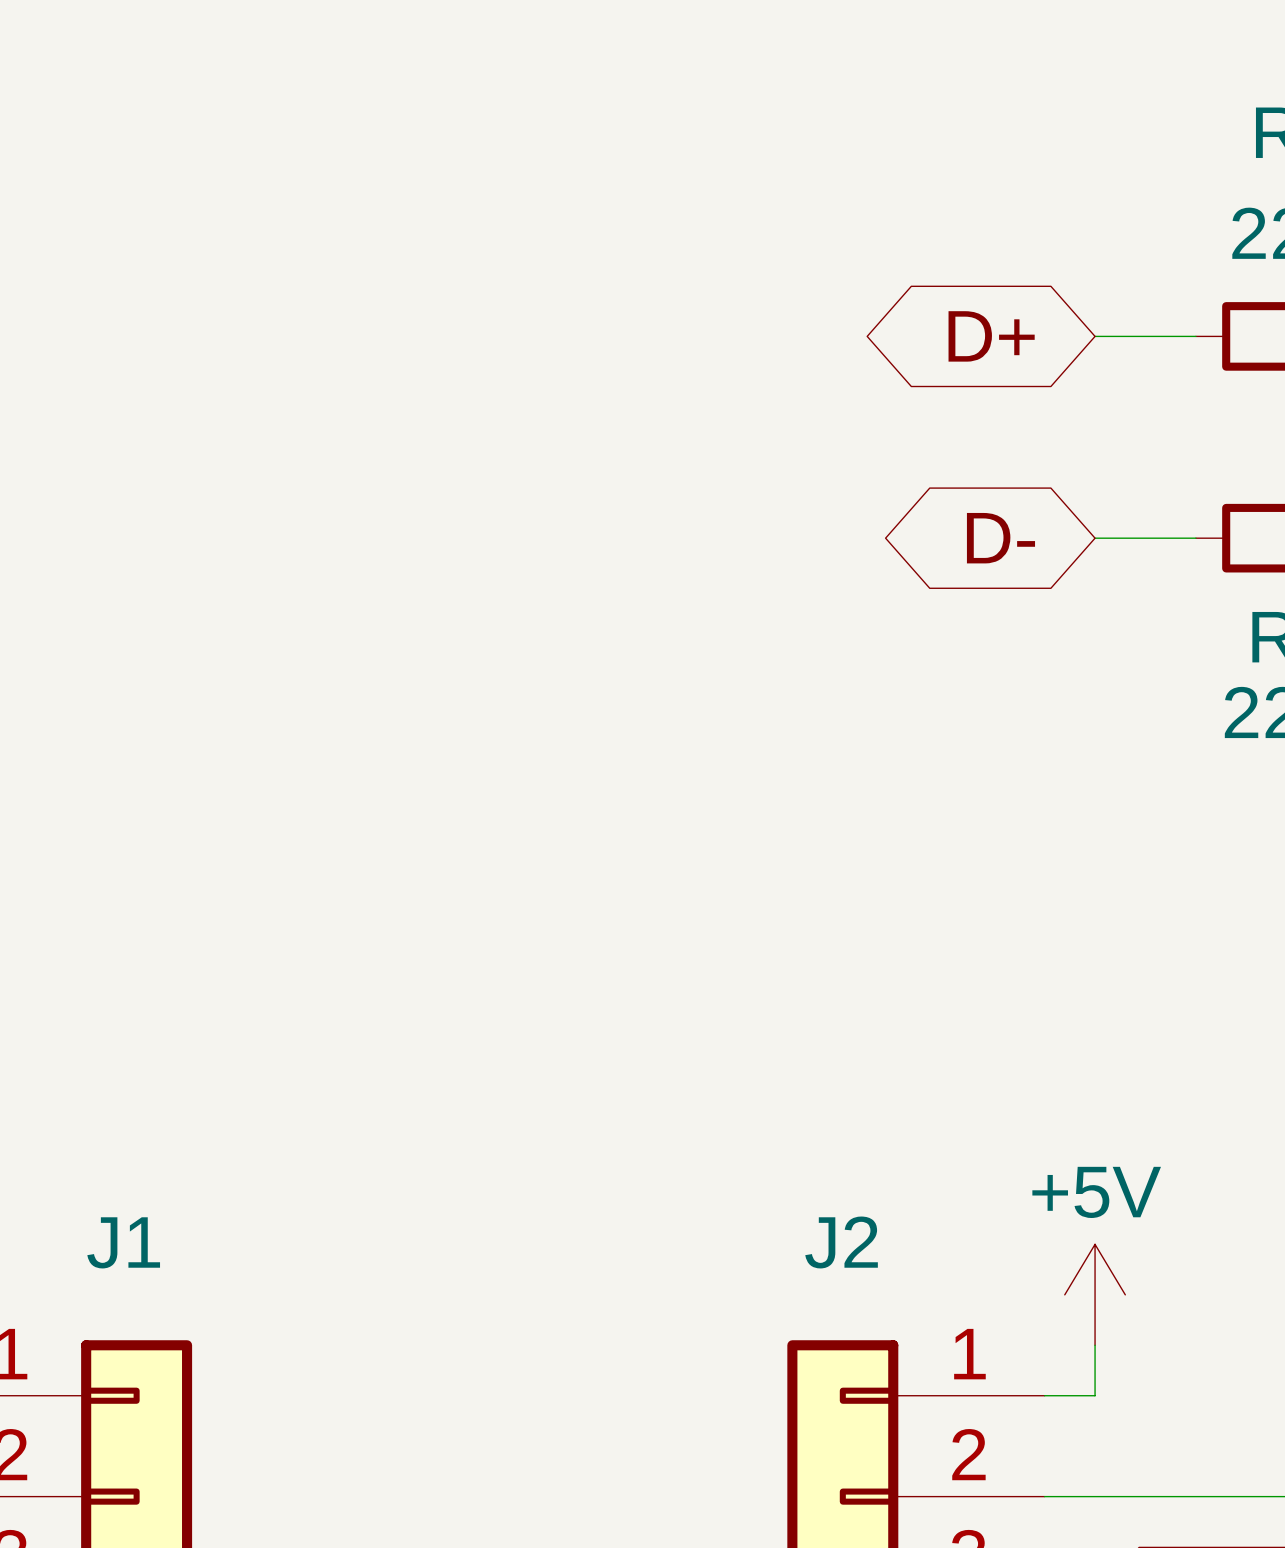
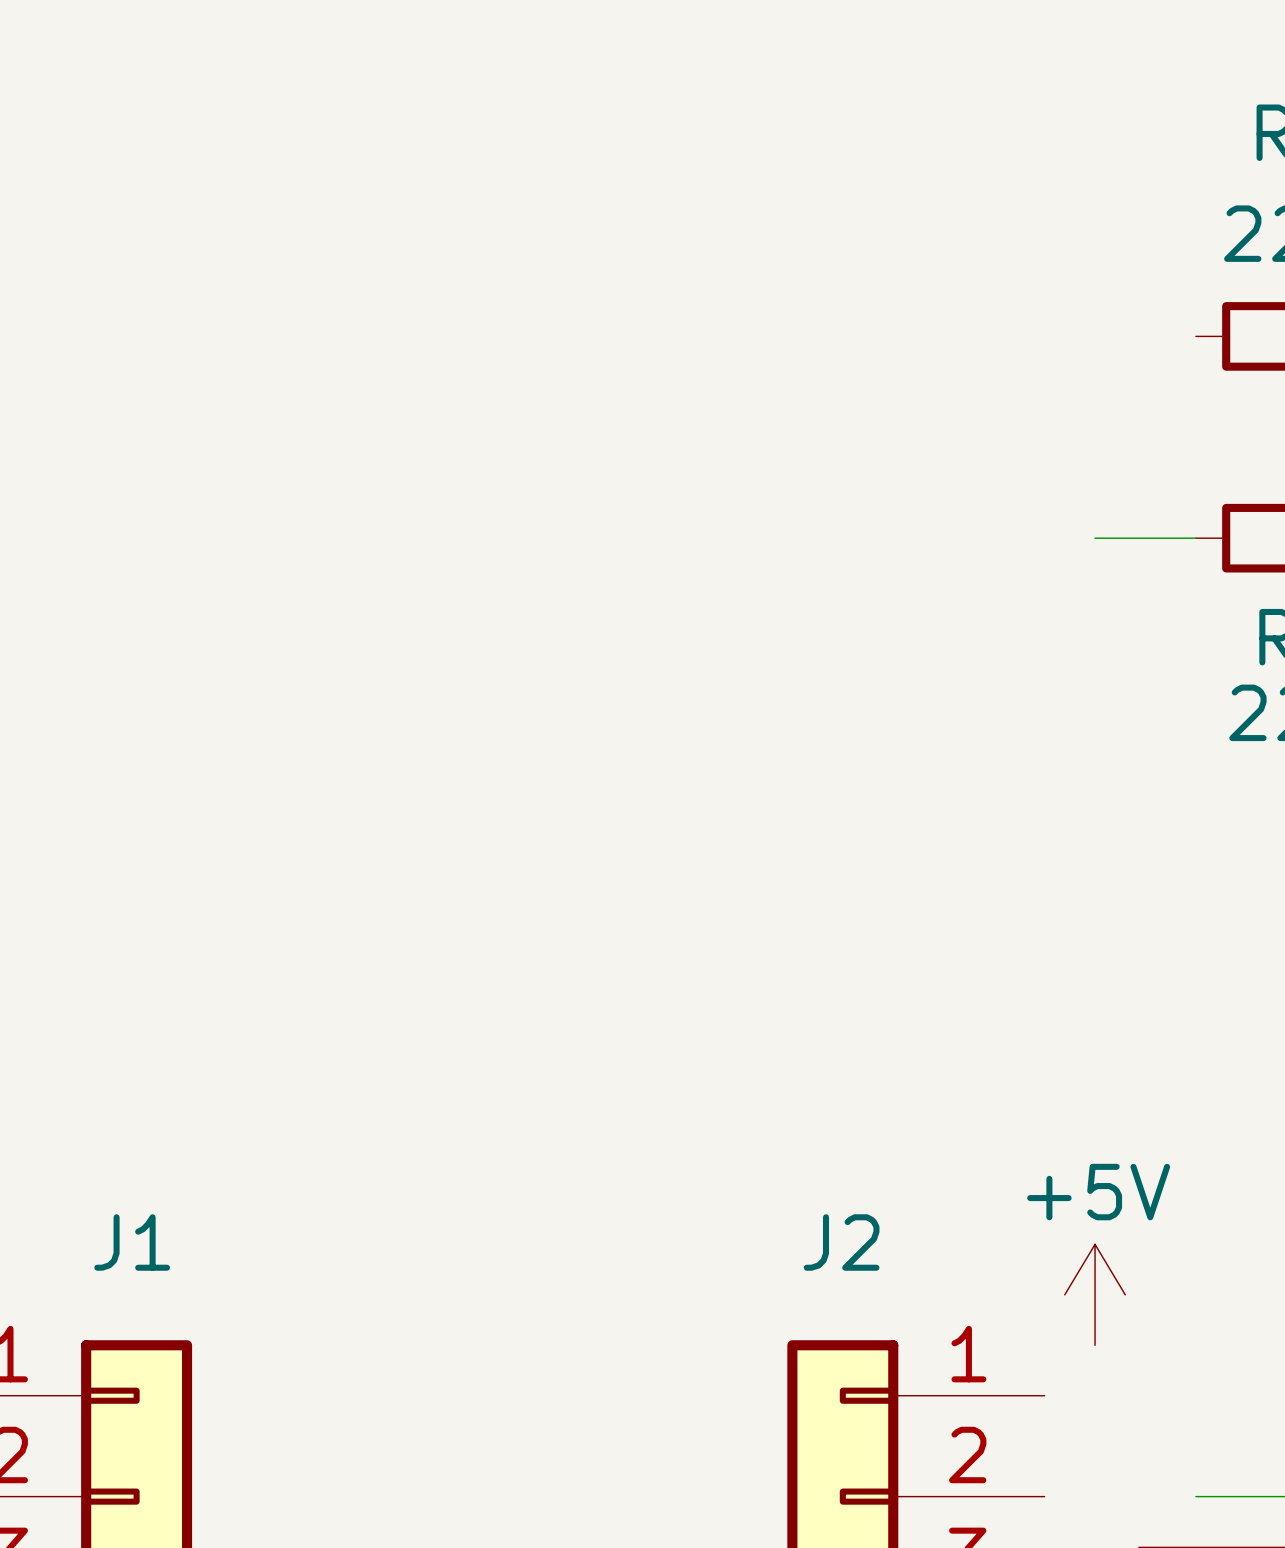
global label: D+ (991, 336) -> none
wire: (1095, 336) (1195, 336) -> none
global label: D- (1000, 538) -> none
wire: (1095, 1345) (1095, 1395) (1044, 1395) -> none
wire: (1044, 1496) (1195, 1496) -> none

